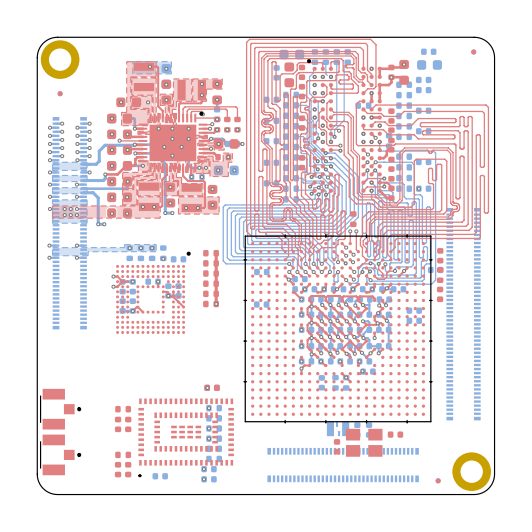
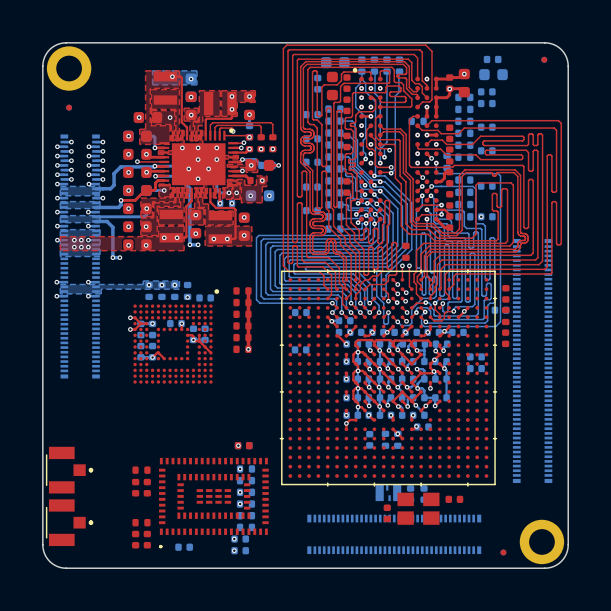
bottom track: (325, 62) (327, 75) -> (374, 71) (375, 93) (380, 98) (380, 149)
bottom track: (347, 62) (344, 65) (344, 120) (334, 129) -> (398, 72) (398, 92) (395, 96) (395, 169) (391, 173)
bottom track: (303, 95) (311, 100) (313, 141) (324, 153) (326, 153) -> (361, 71) (361, 79) (365, 83) (365, 91) (375, 101) (375, 175)

